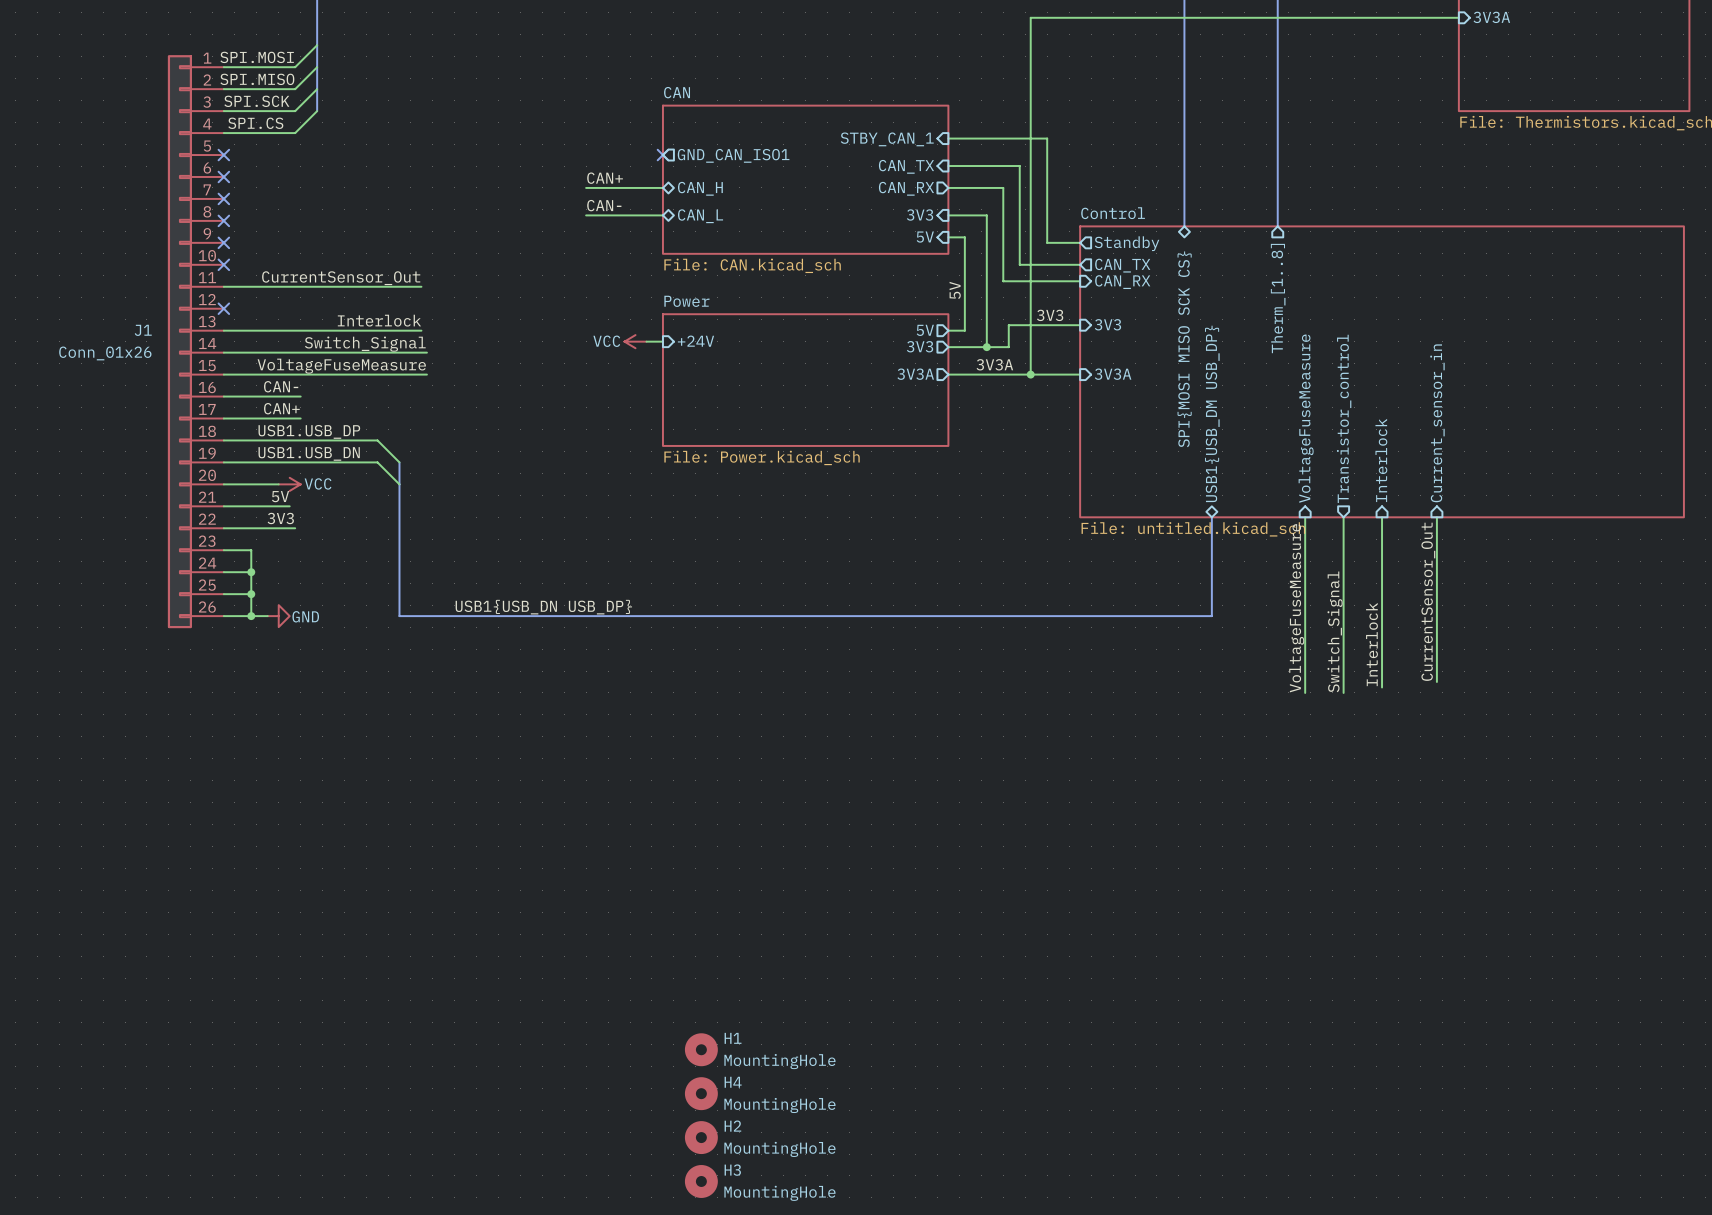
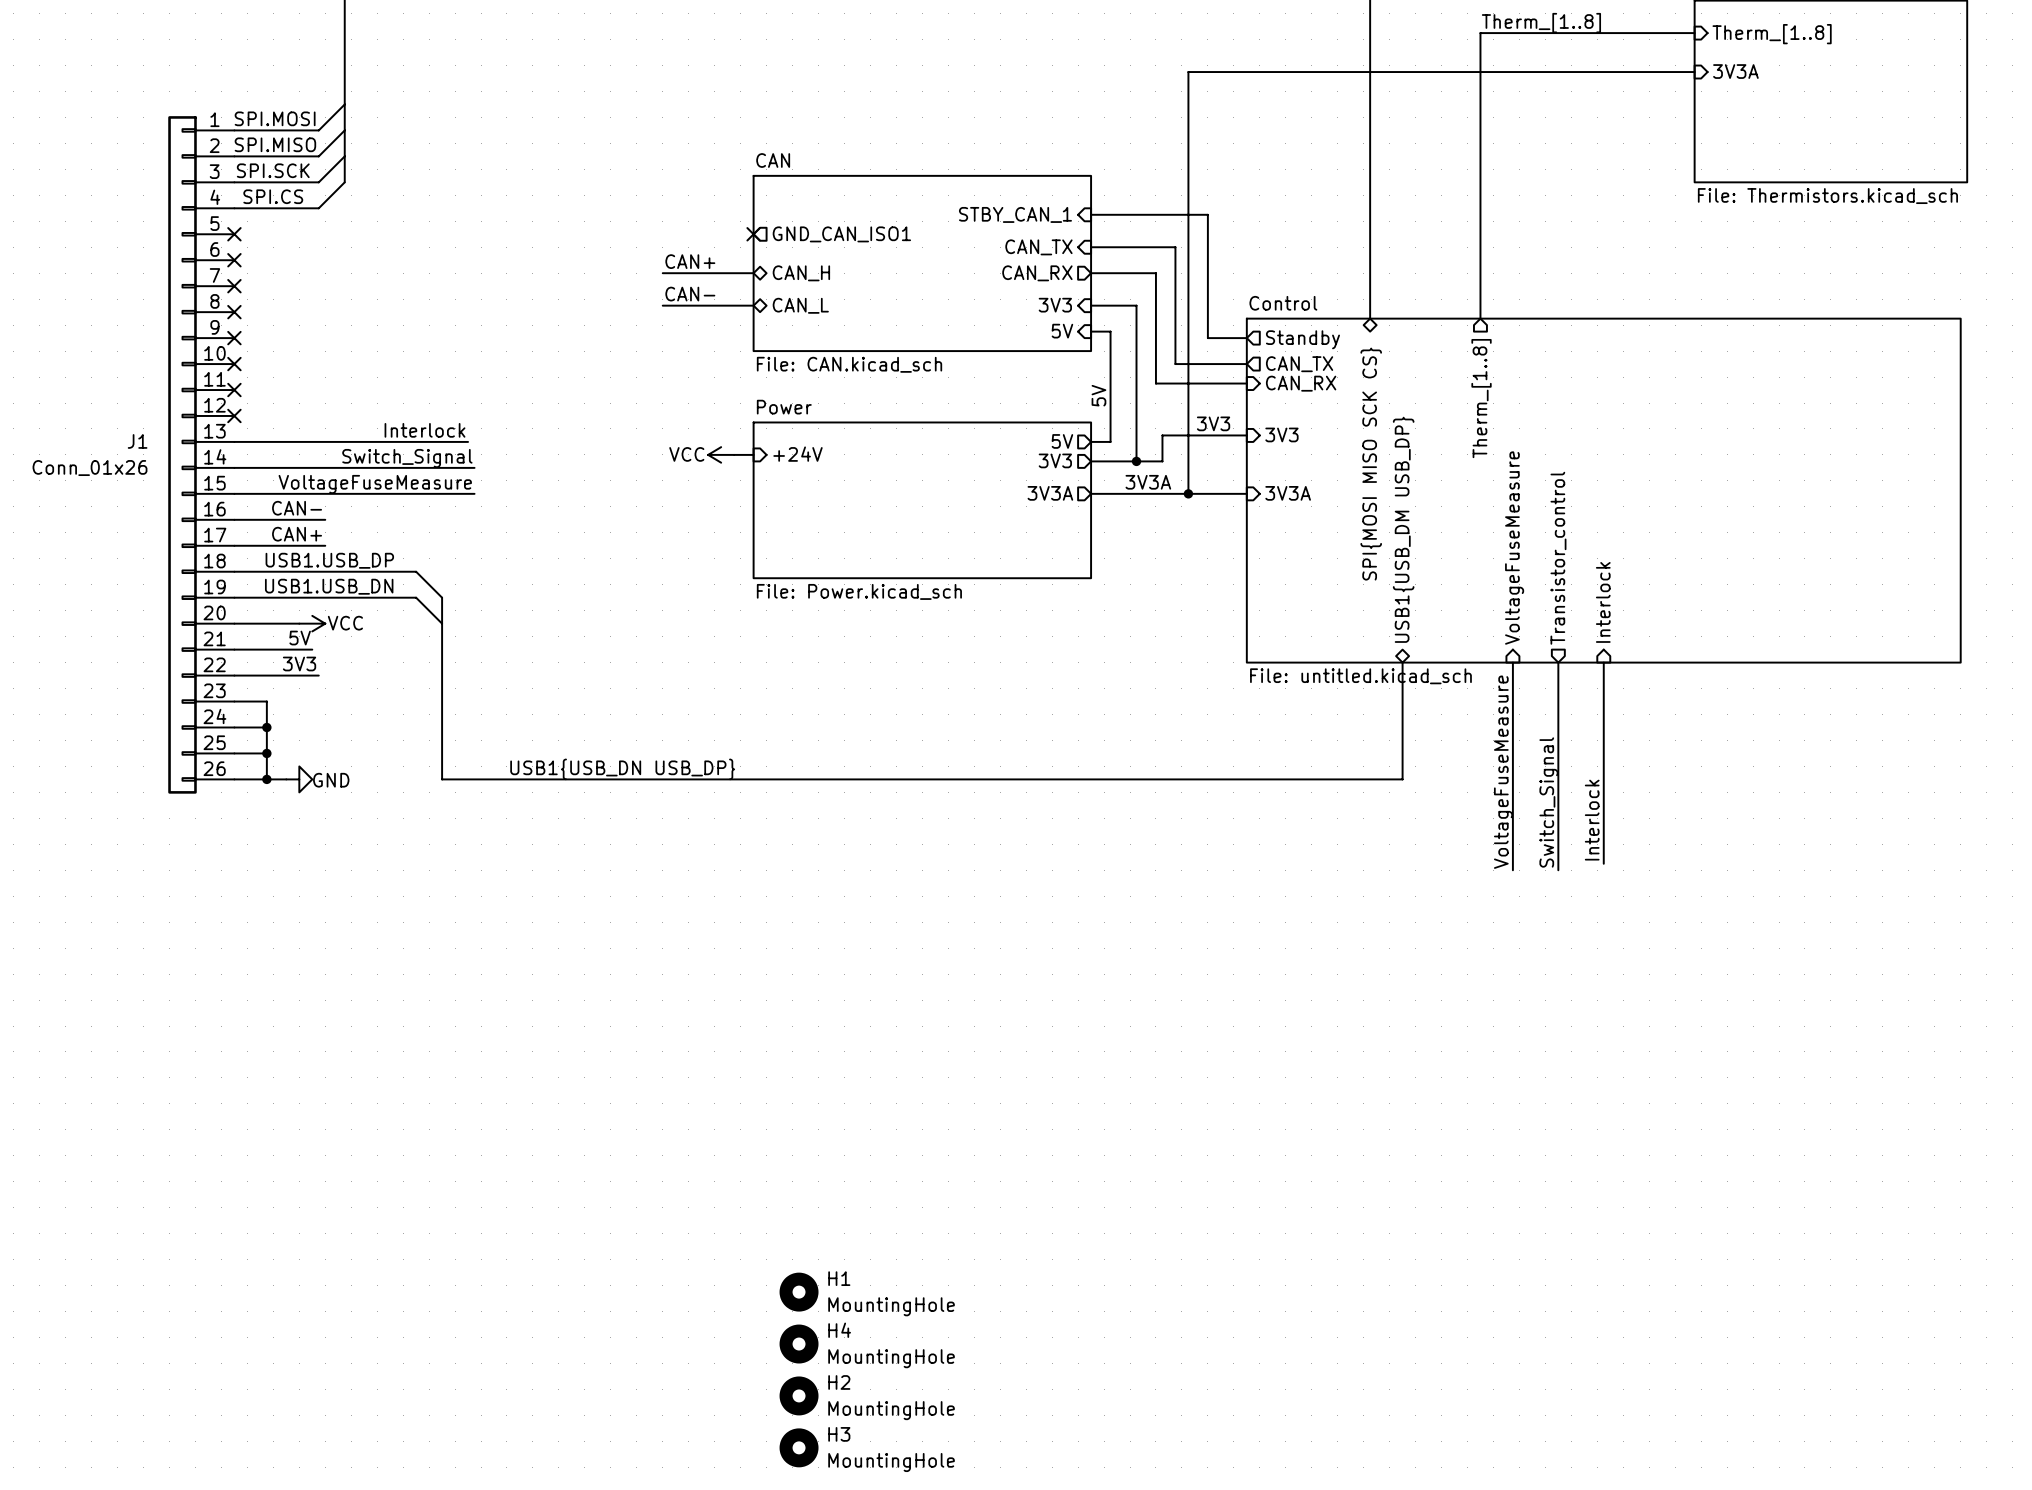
label: CurrentSensor_Out (341, 278) -> none
wire: (223, 286) (421, 286) -> none
no-connect mark: none -> (234, 390)
sheet pin: Current_sensor_in (1437, 423) -> none
wire: (1436, 517) (1436, 681) -> none
label: CurrentSensor_Out (1428, 601) -> none

